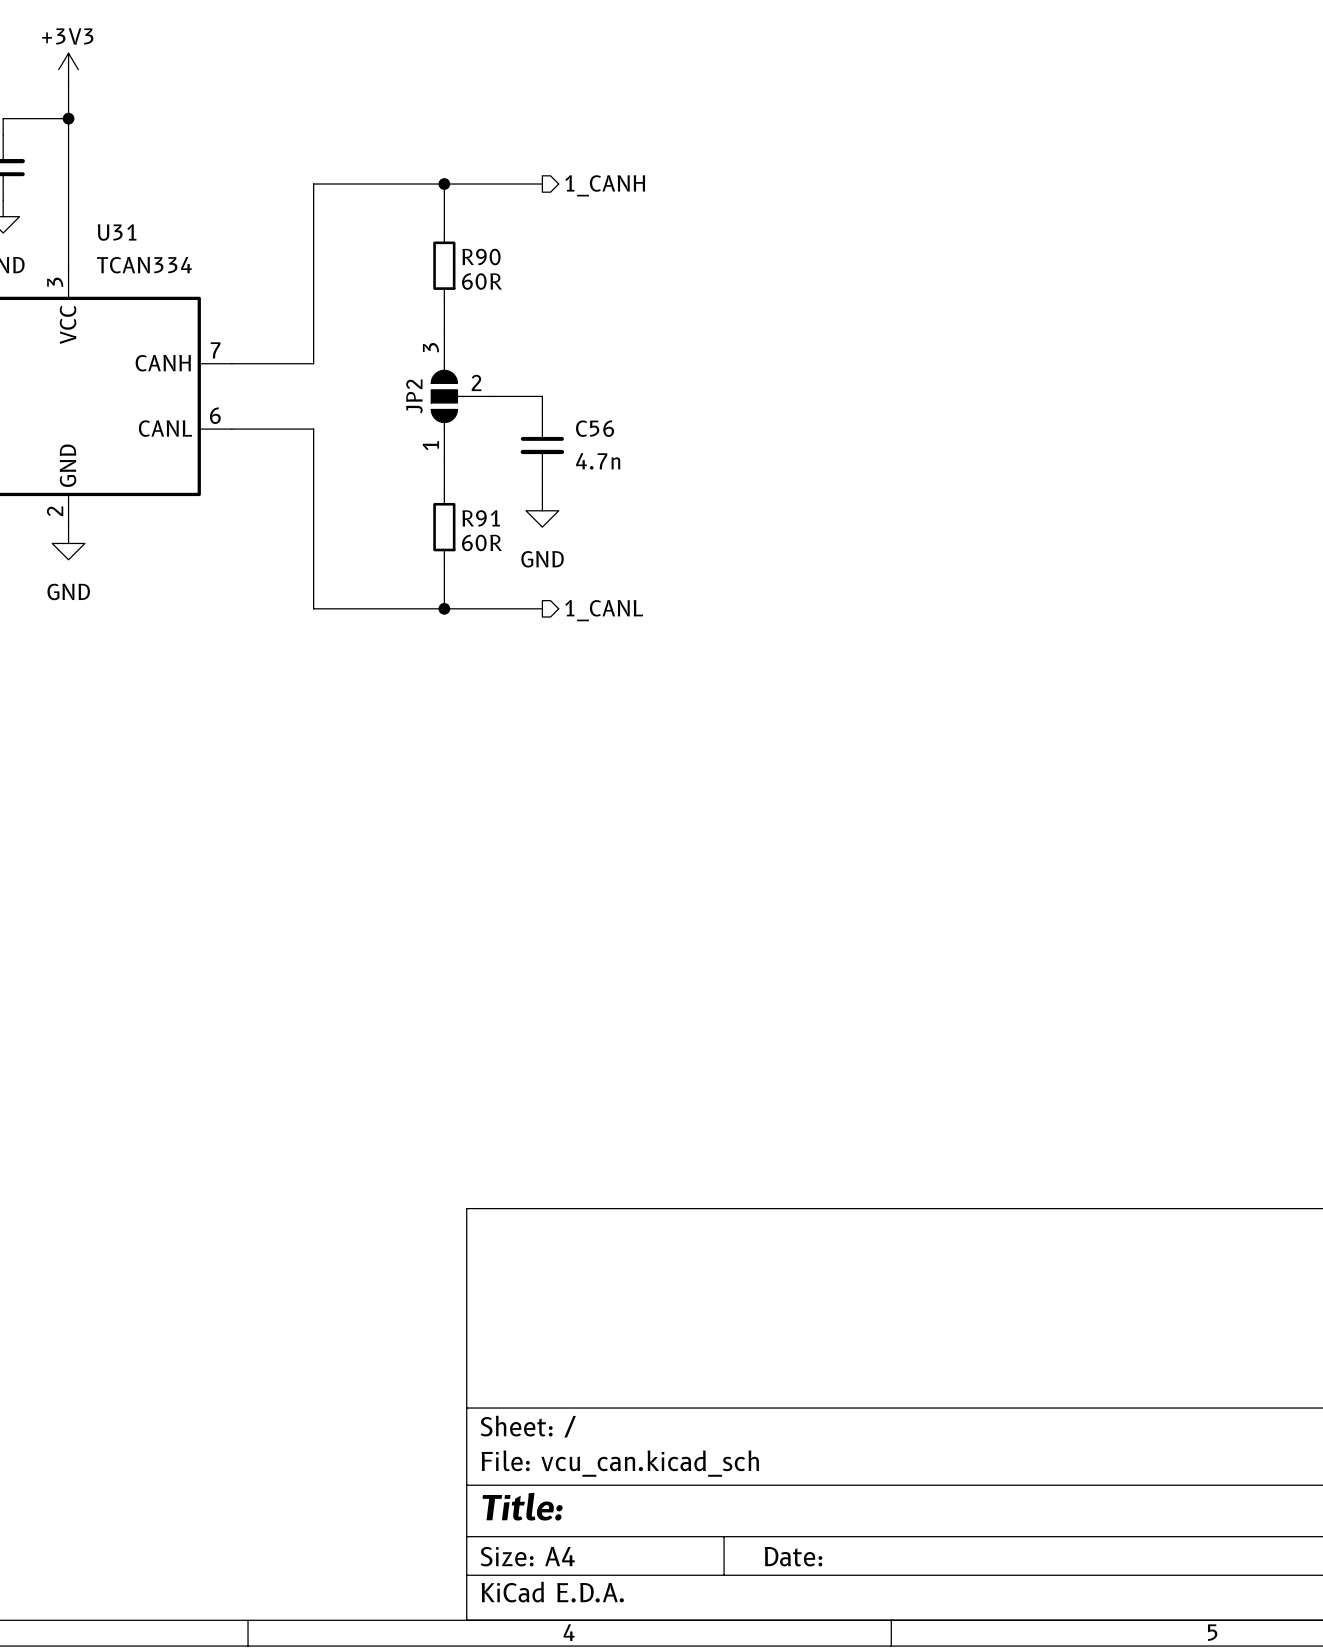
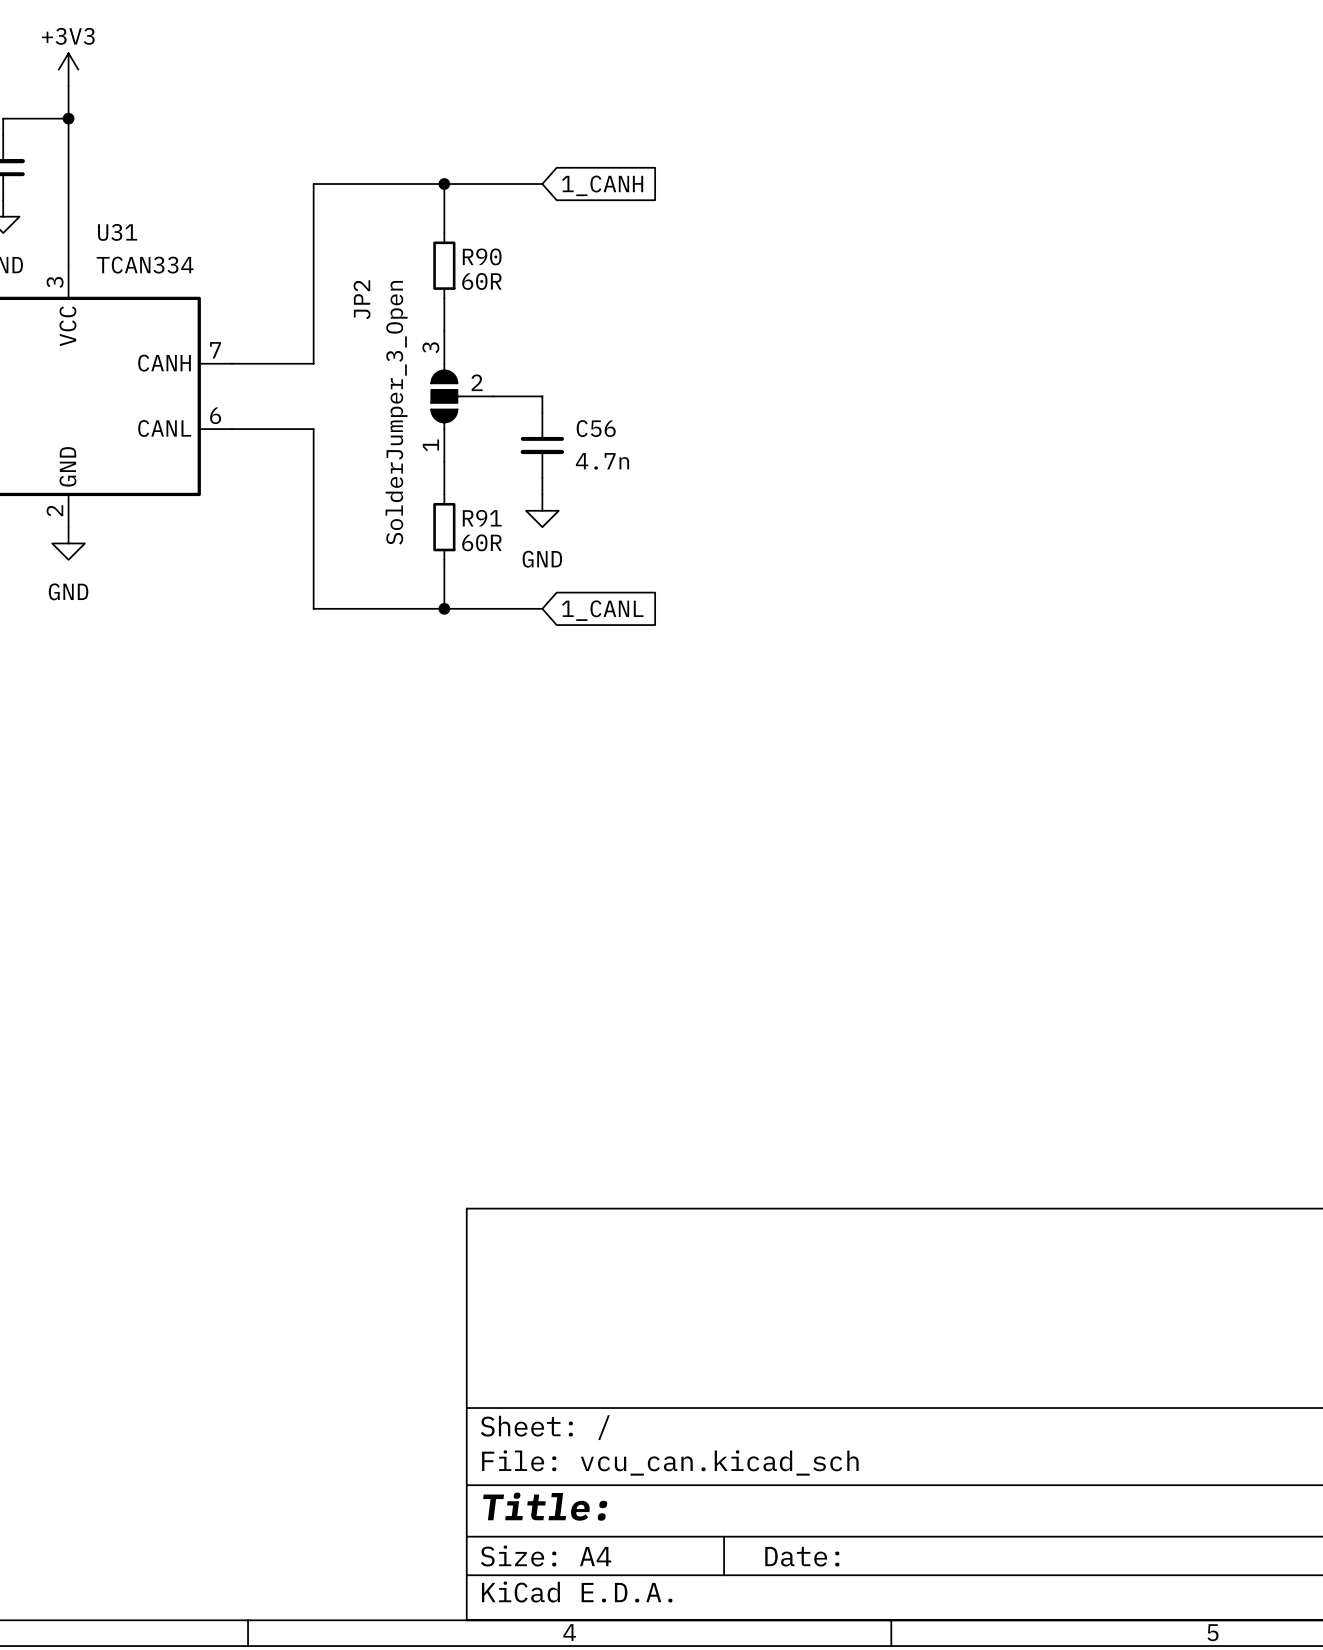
hierarchical label: 1_CANH (605, 185) -> none
global label: none -> 1_CANH (602, 185)
JP2 value: none -> SolderJumper_3_Open (396, 412)
JP2 name position: JP2 (414, 396) -> JP2 (362, 299)
hierarchical label: 1_CANL (604, 610) -> none
global label: none -> 1_CANL (602, 610)

